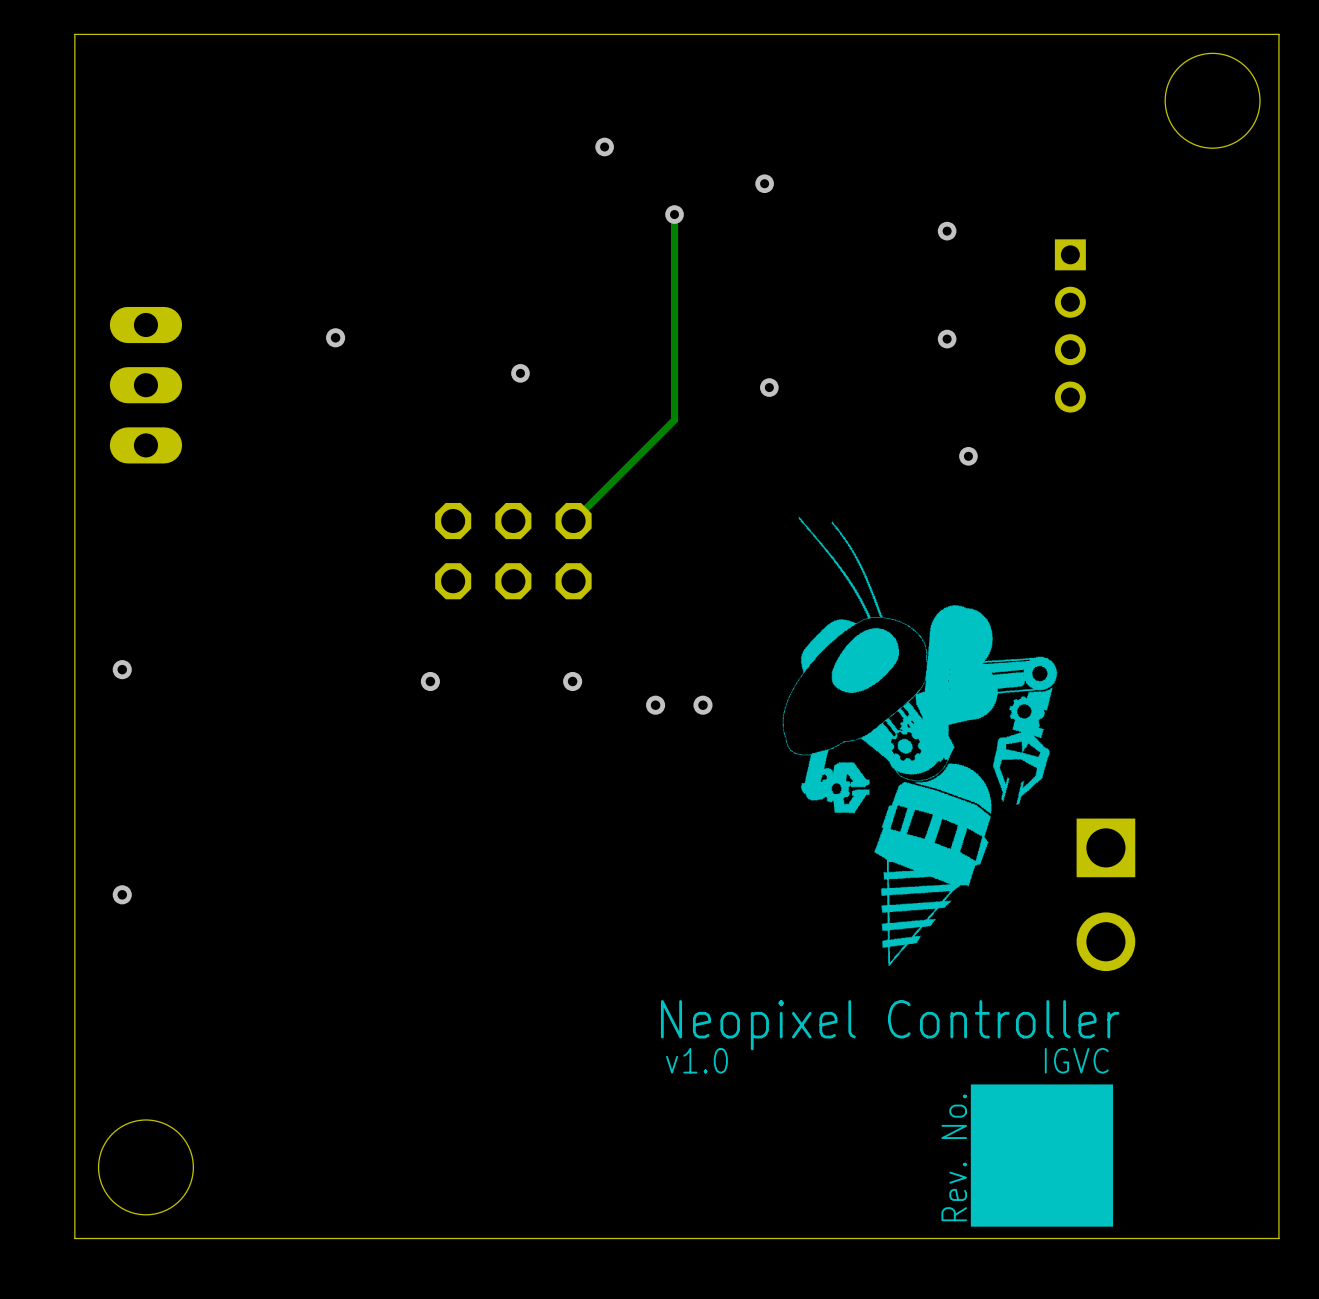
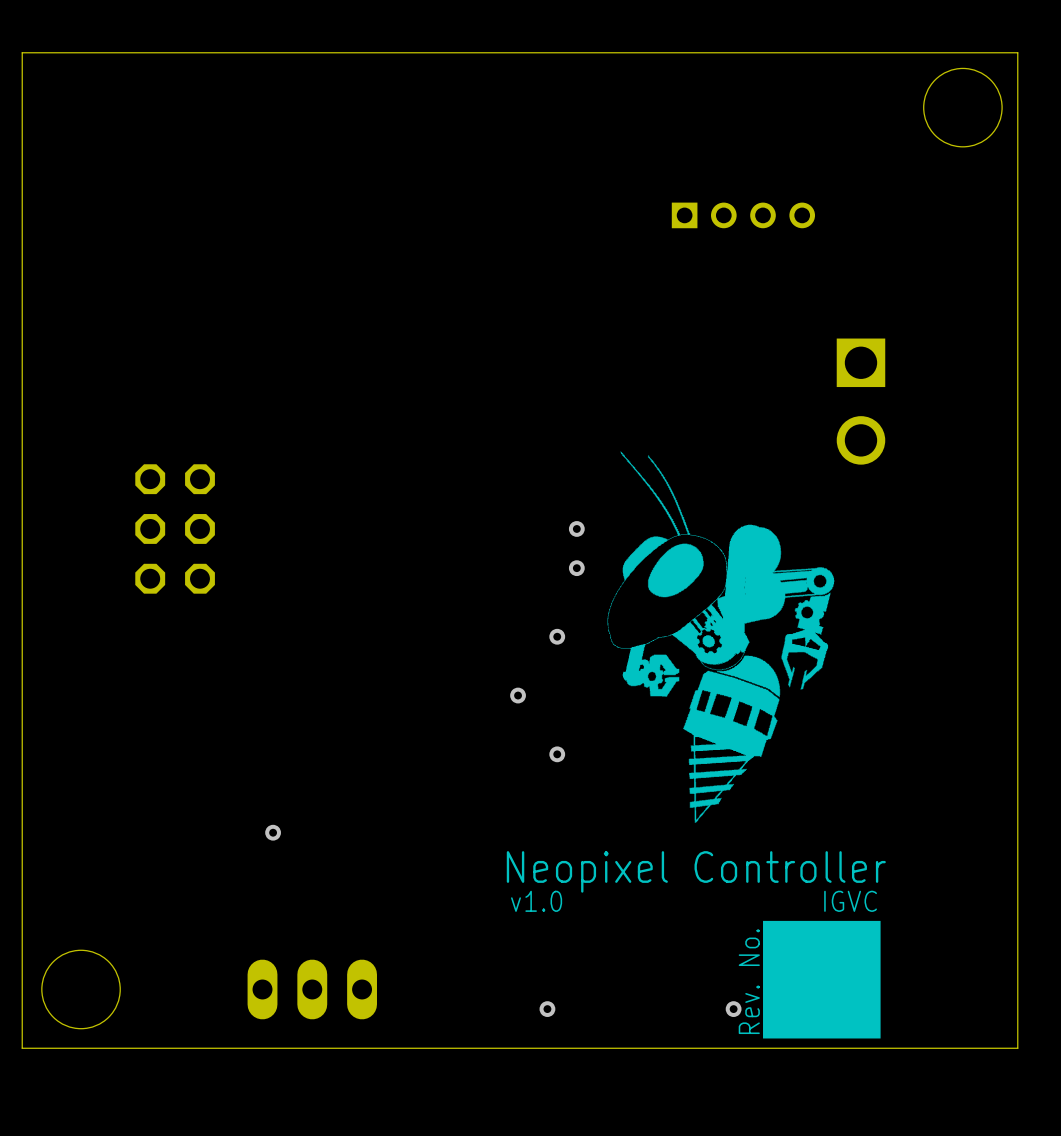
via: (604, 146) -> none
via: (764, 183) -> none
track: (674, 214) (674, 420) (573, 521) -> none
via: (674, 214) -> none
via: (947, 231) -> none
part rotation: 0° (1070, 325) -> 90° counterclockwise (743, 215)
part position: (1070, 325) -> (743, 215)
via: (335, 337) -> none
via: (947, 339) -> none
via: (520, 373) -> none
part: (145, 385) -> none
via: (769, 387) -> none
via: (968, 456) -> none
part rotation: 0° (513, 551) -> 90° clockwise (175, 528)
part position: (513, 551) -> (175, 528)
via: none -> (576, 528)
via: none -> (576, 568)
via: (122, 669) -> none
via: (430, 681) -> none
via: (572, 681) -> none
via: (655, 705) -> none
via: (702, 705) -> none
via: none -> (557, 636)
via: none -> (518, 695)
via: none -> (557, 754)
via: (122, 894) -> none
part position: (1105, 894) -> (860, 401)
via: none -> (273, 832)
part: none -> (312, 989)
via: none -> (547, 1009)
via: none -> (733, 1009)

